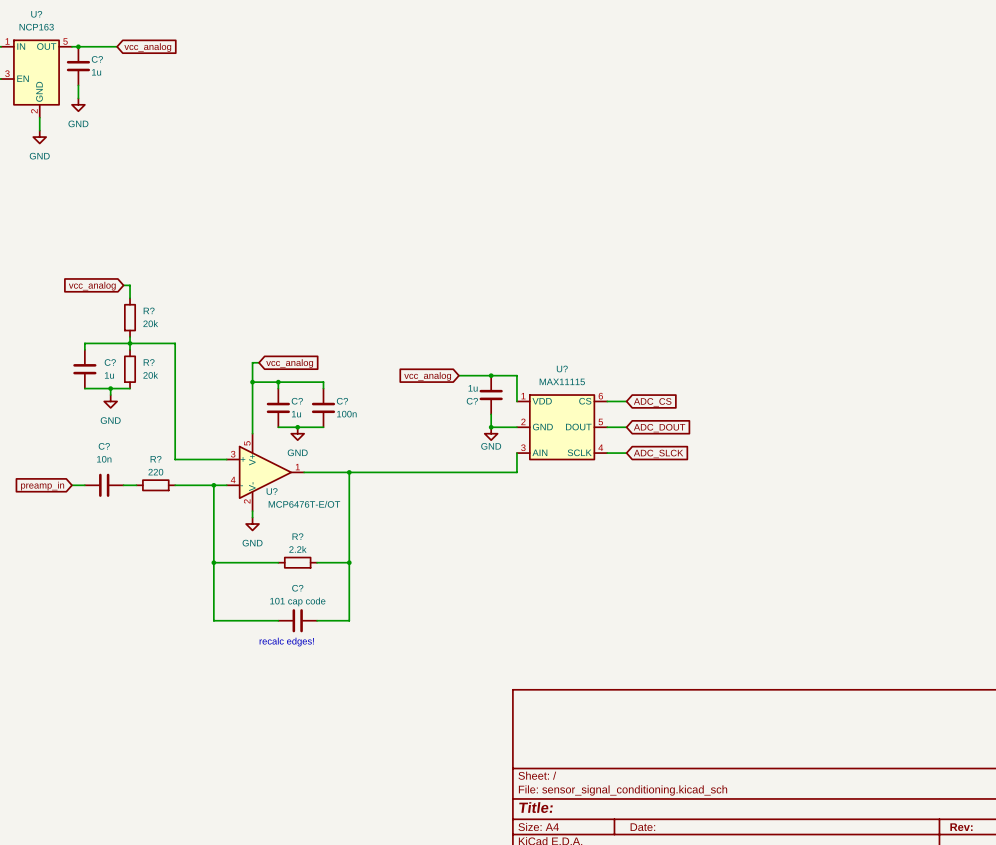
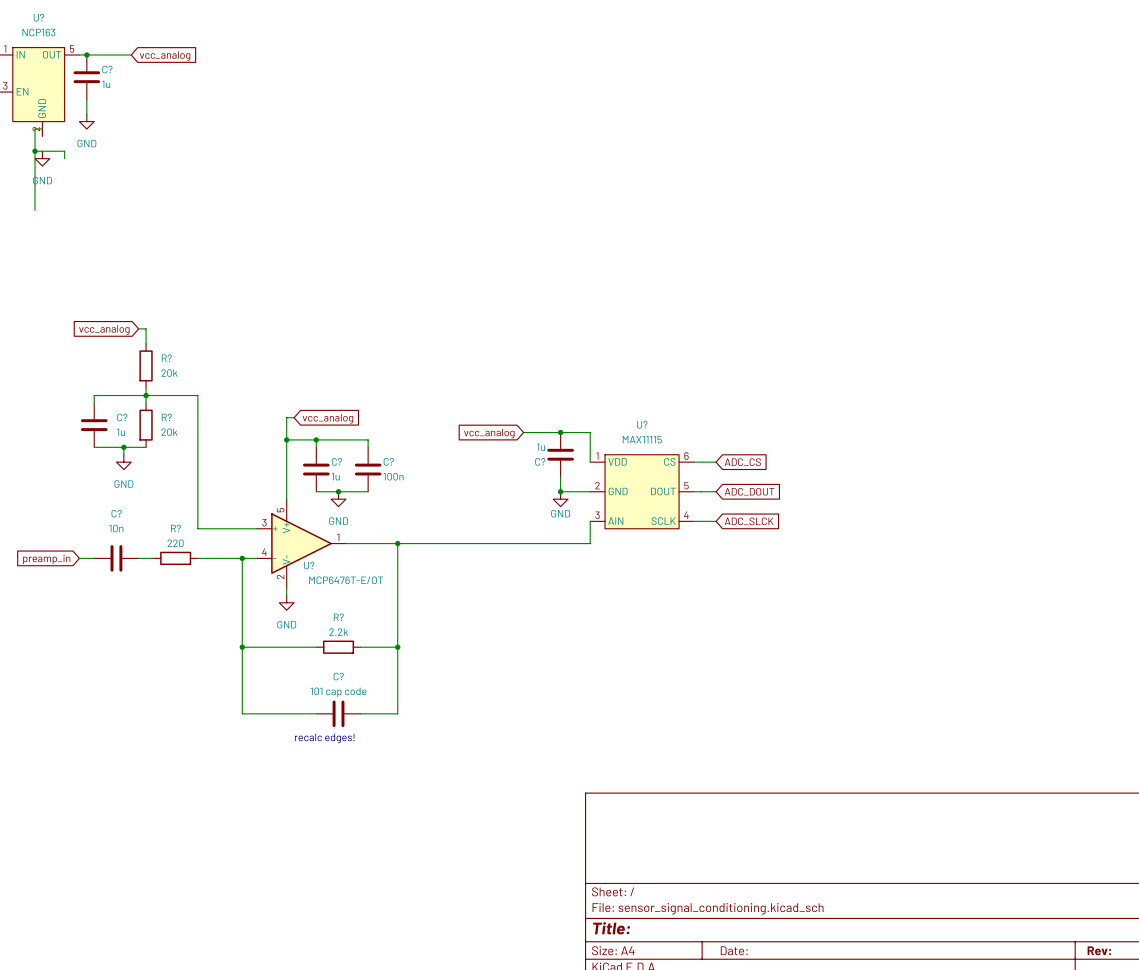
wire: none -> (42, 129) (35, 129) (35, 210)
wire: (39, 117) (39, 130) -> none
wire: none -> (35, 151) (64, 151) (64, 158)
junction: none -> (35, 151)

